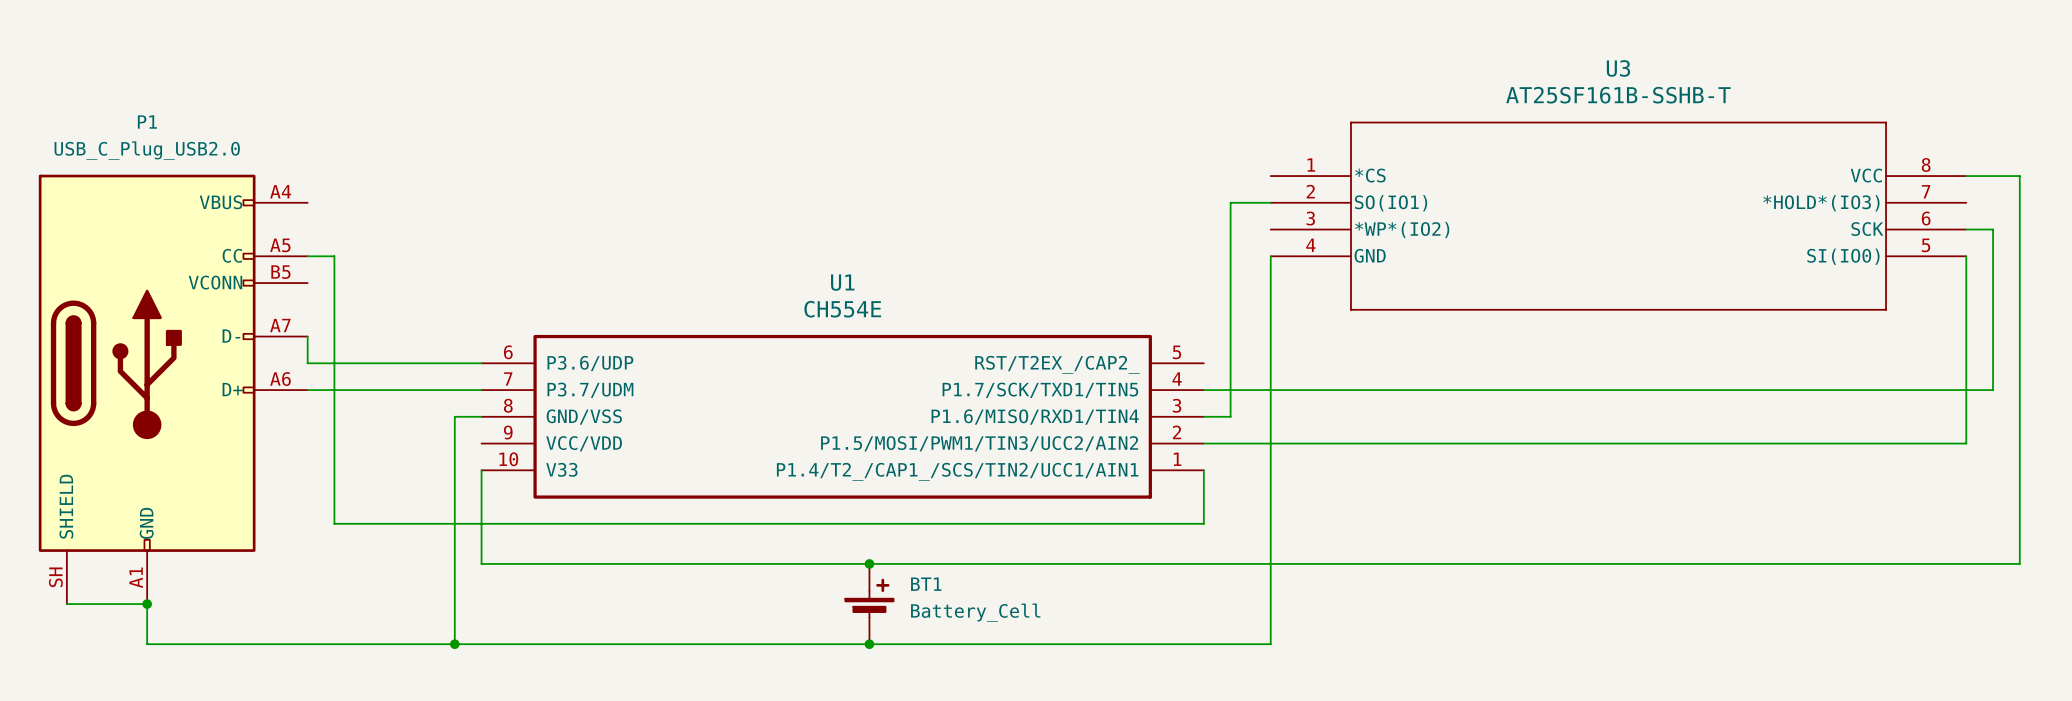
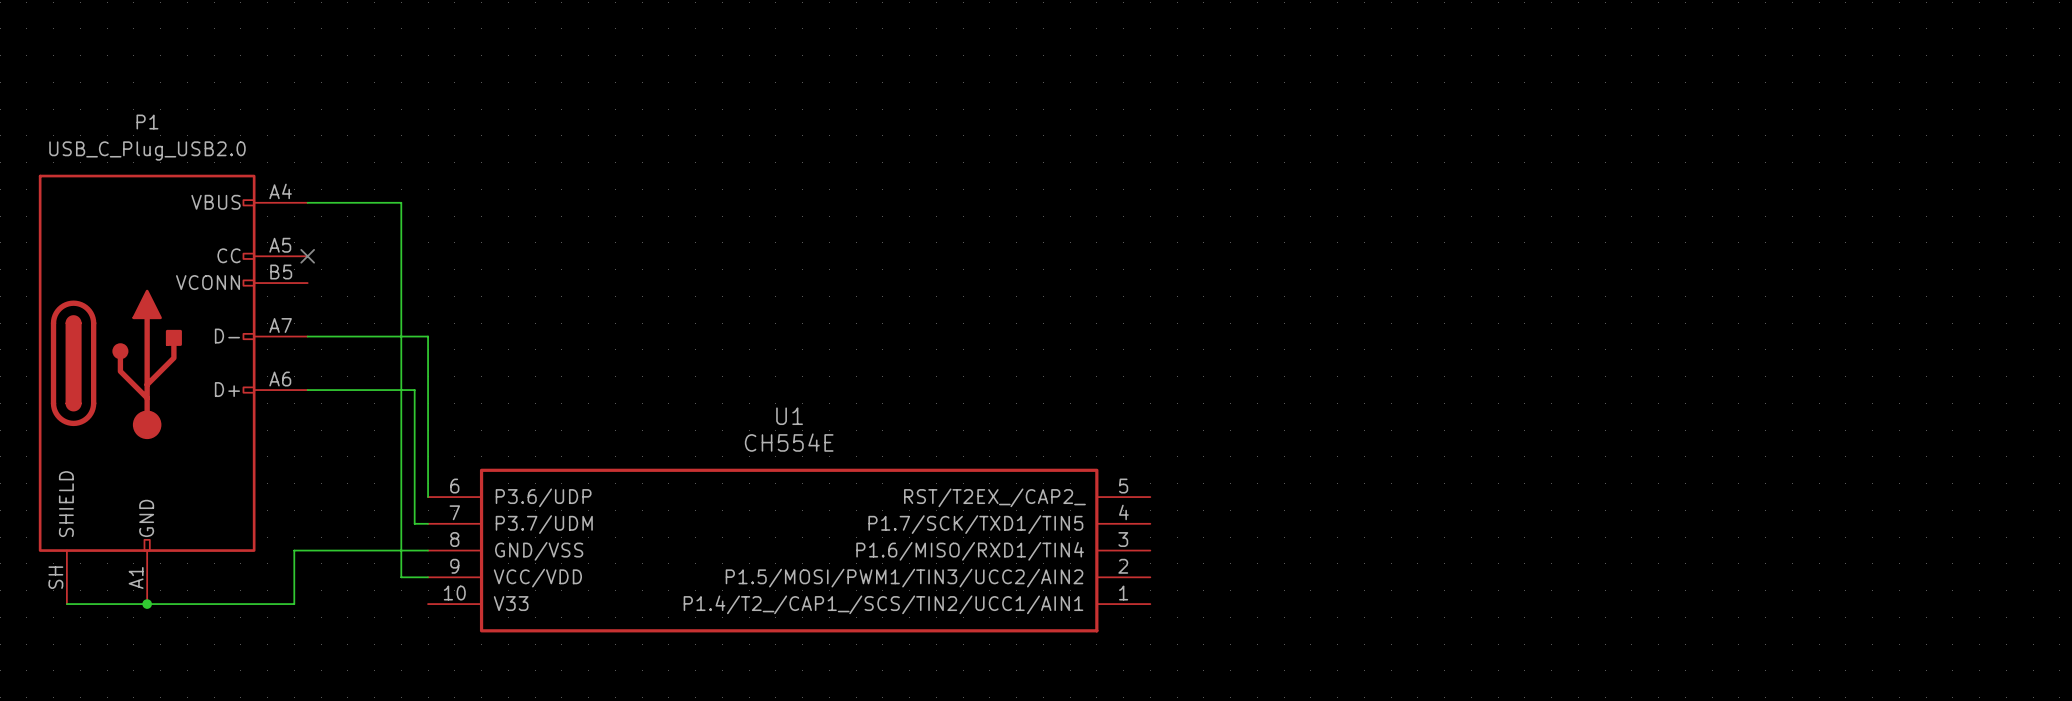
wire: (1966, 176) (2019, 176) (2019, 563) (481, 563) (481, 470) -> none
wire: none -> (307, 202) (401, 202) (401, 577) (428, 577)
wire: (1270, 202) (1230, 202) (1230, 416) (1203, 416) -> none
U3: AT25SF161B-SSHB-T (1618, 216) -> none
wire: (1966, 229) (1993, 229) (1993, 390) (1203, 390) -> none
wire: (307, 256) (334, 256) (334, 523) (414, 523) -> none
no-connect mark: none -> (307, 256)
wire: (1270, 256) (1270, 644) (147, 644) (147, 604) -> (428, 550) (294, 550) (294, 604) (147, 604)
wire: (1966, 256) (1966, 443) (1203, 443) -> none
wire: (307, 336) (307, 363) (481, 363) -> (307, 336) (428, 336) (428, 497)
wire: (414, 390) (481, 390) -> (414, 390) (414, 523)
wire: (481, 416) (454, 416) (454, 644) -> none
U1 position: (842, 416) -> (789, 550)
wire: (1203, 470) (1203, 523) (428, 523) -> none
junction: (869, 563) -> none
BT1: Battery_Cell (869, 604) -> none
junction: (454, 644) -> none
junction: (869, 644) -> none

